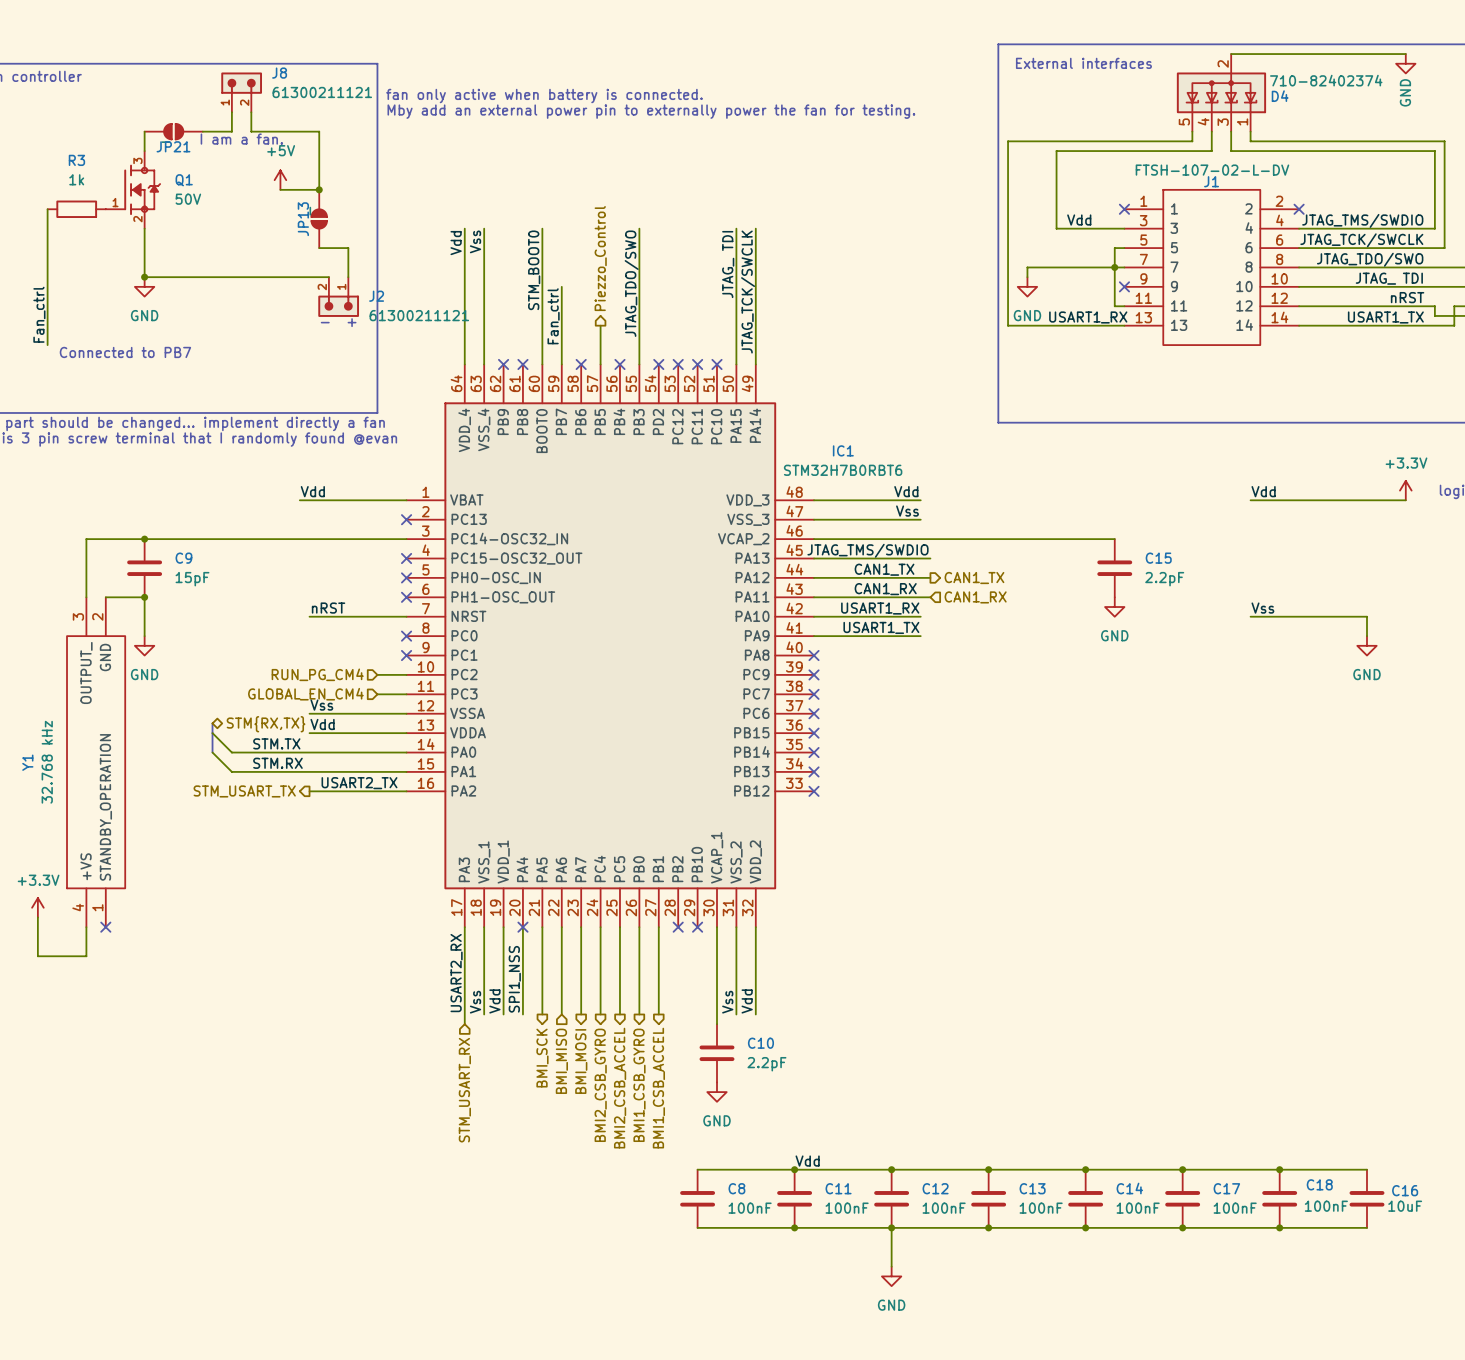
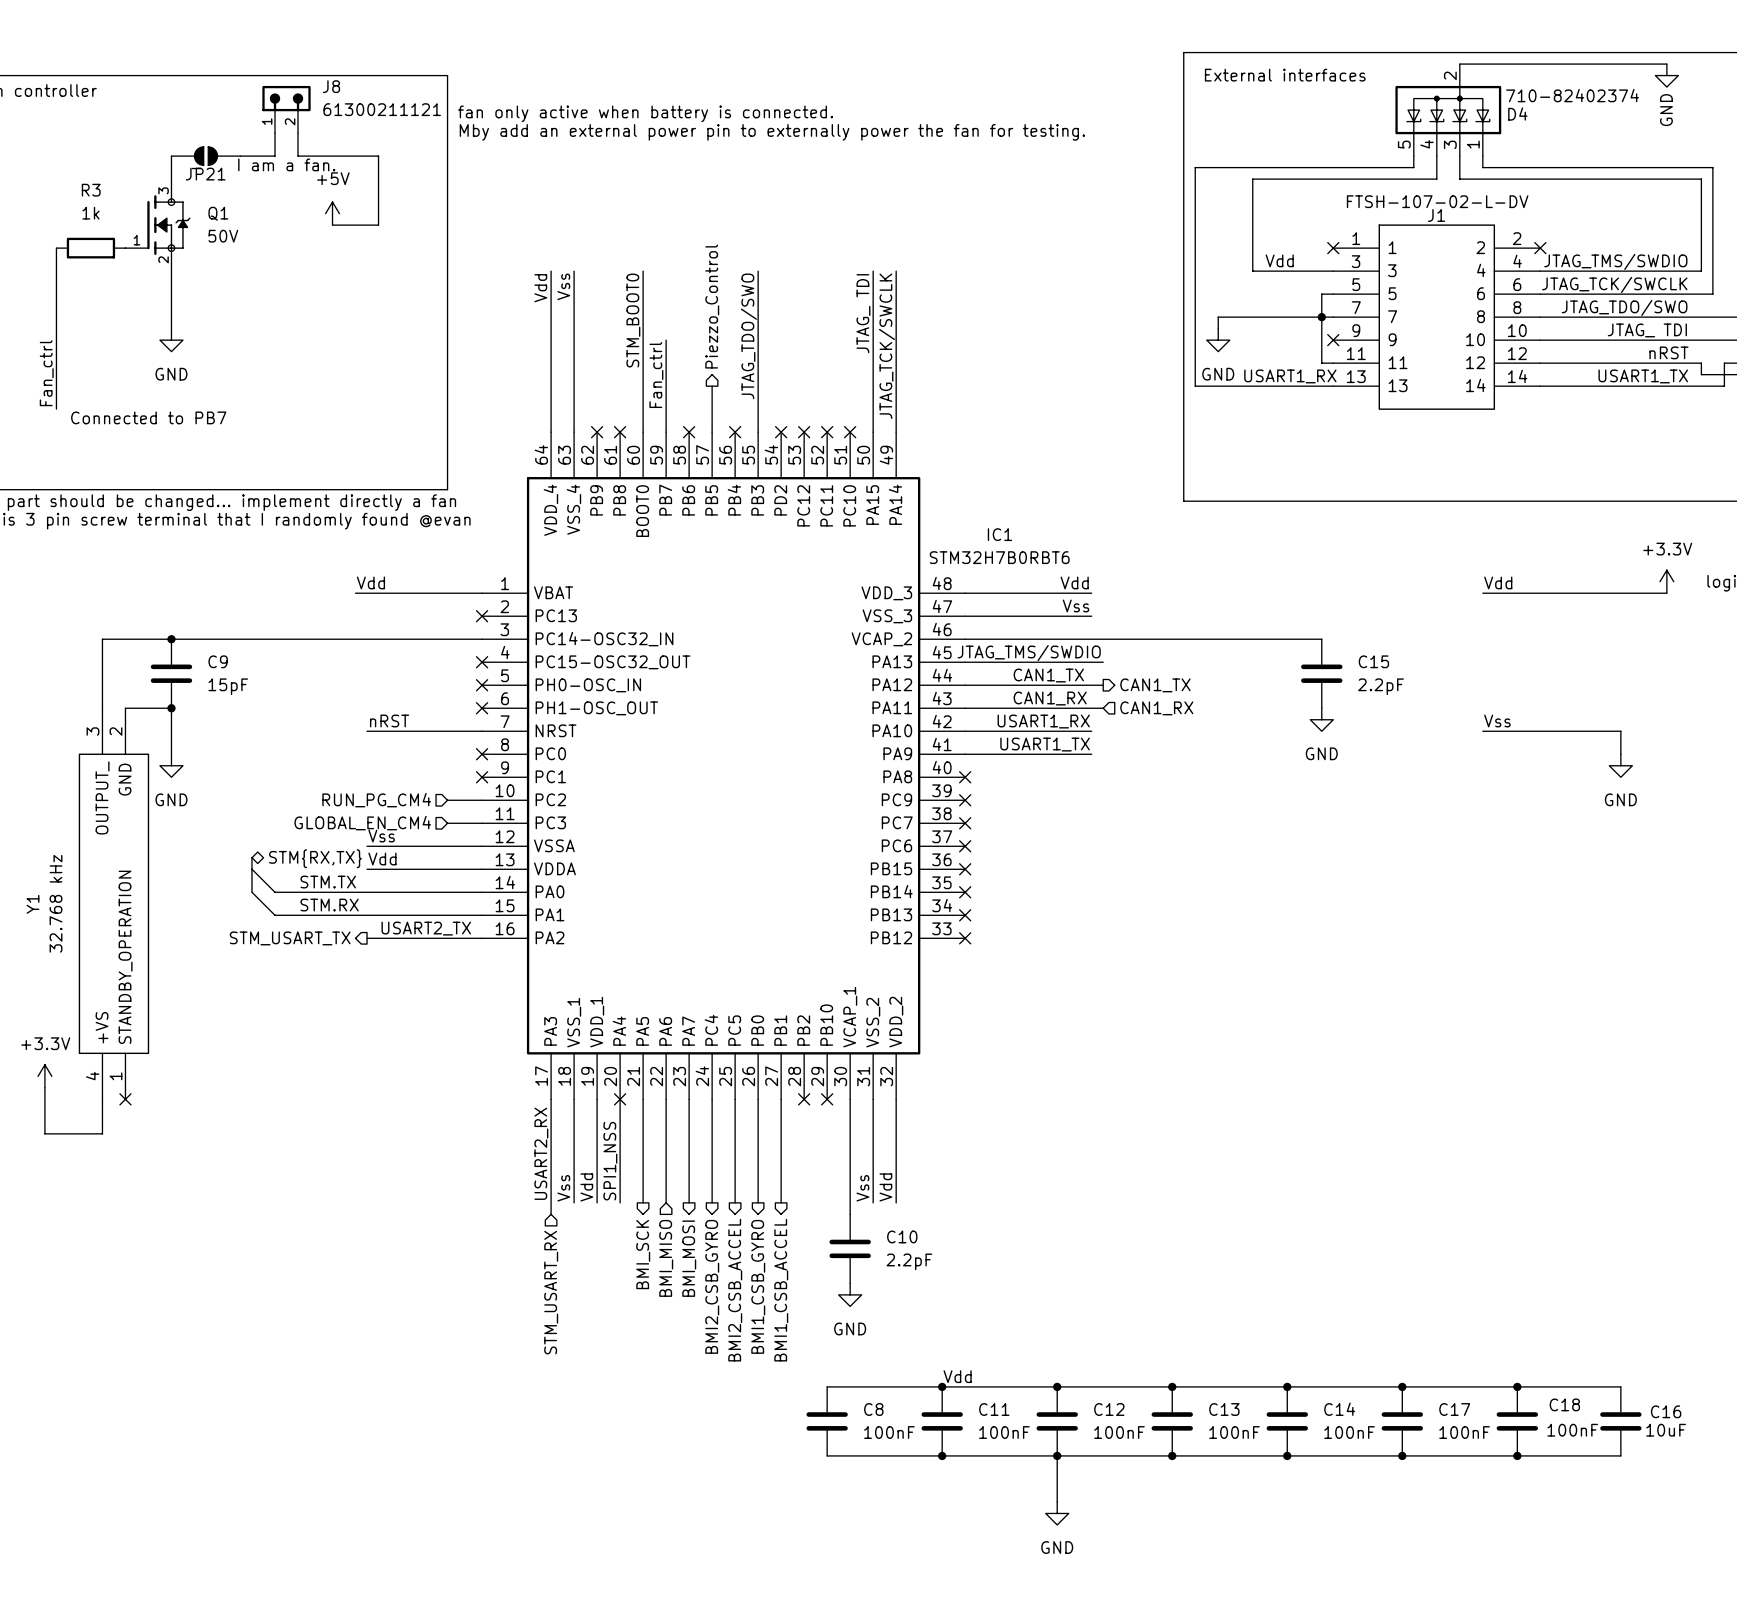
junction: (319, 189) -> none
JP13: - (319, 218) -> none
wire: (319, 248) (348, 248) (348, 277) -> none
wire: (144, 277) (328, 277) -> none
junction: (144, 277) -> none
J2: 61300211121 (338, 297) -> none
text: - + (338, 322) -> none

